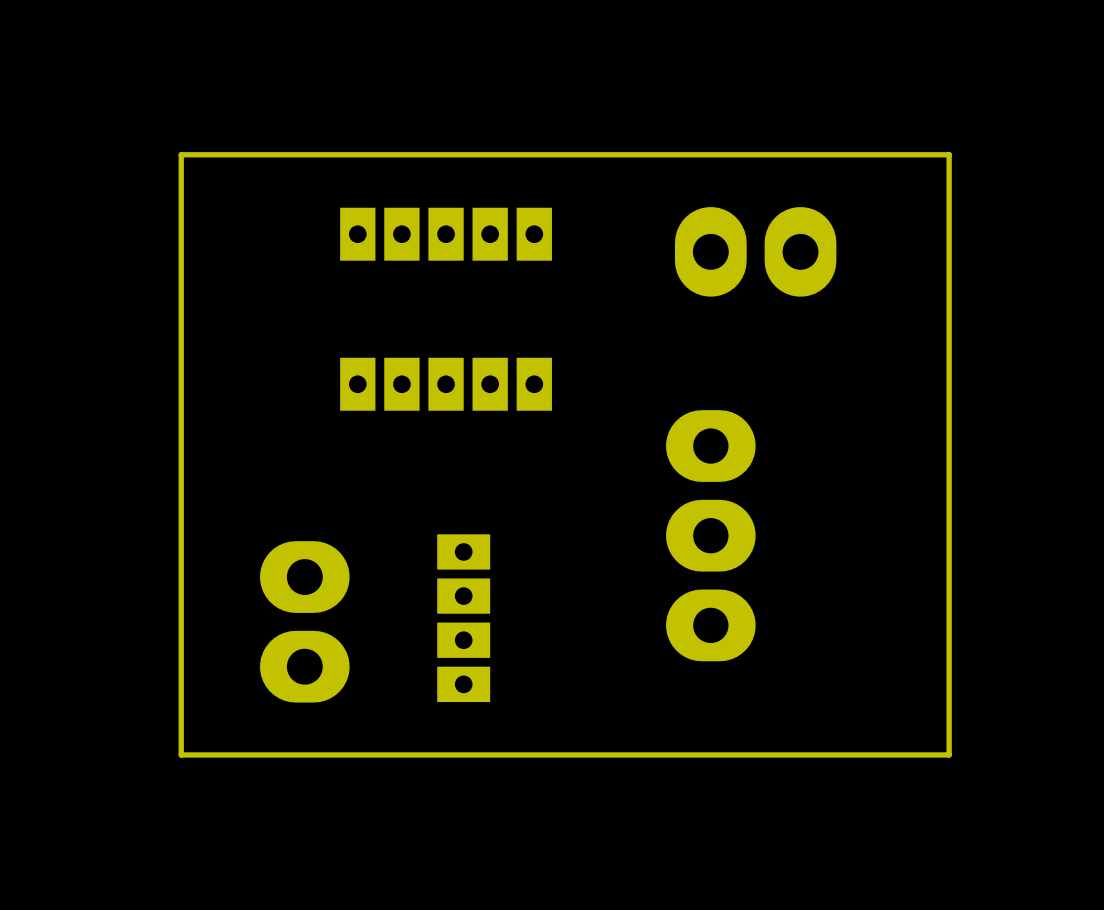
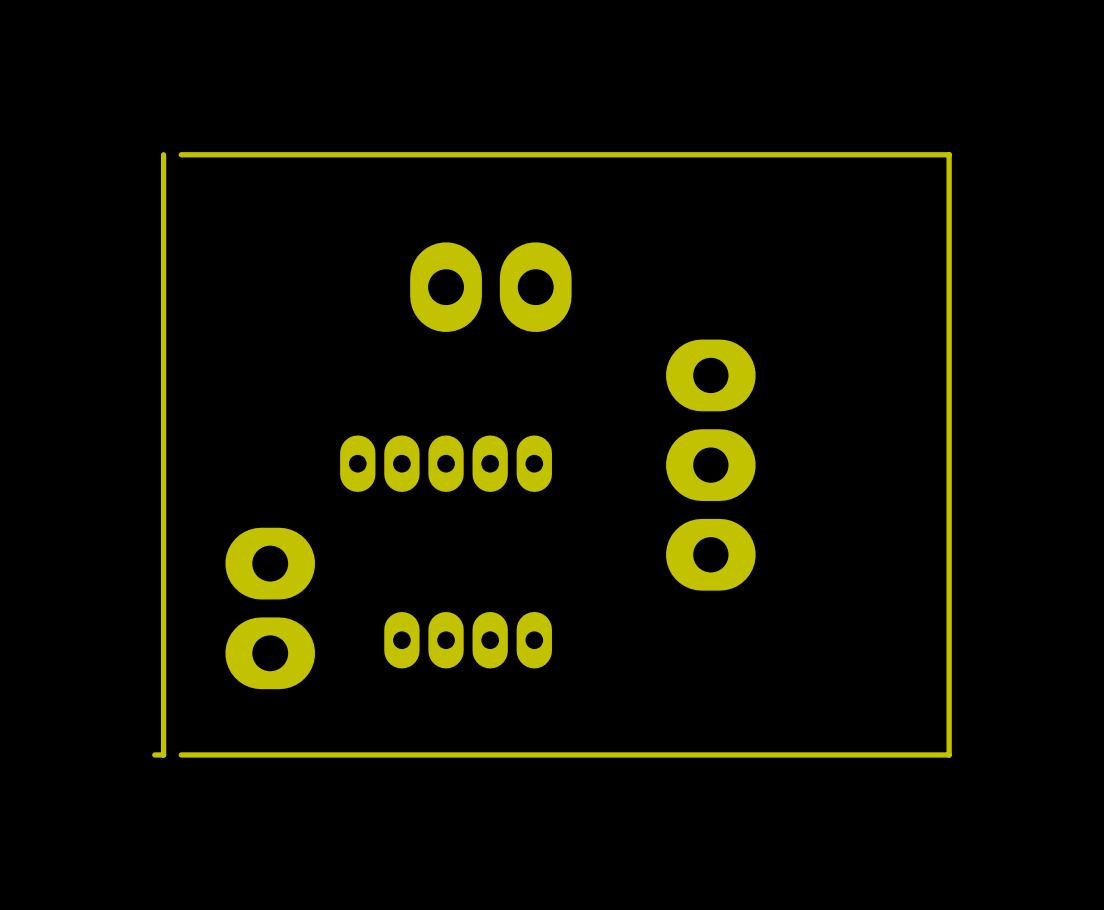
board edge: none -> (163, 154) (163, 754) (154, 754)
board edge: (181, 154) (181, 754) -> none
part: (446, 234) -> none
part: (755, 251) -> none
part: none -> (490, 287)
part: (446, 384) -> none
part: none -> (446, 463)
part footprint: [437, 534, 491, 703] -> [384, 611, 552, 669]
part position: (710, 535) -> (710, 465)
part position: (304, 621) -> (270, 608)

